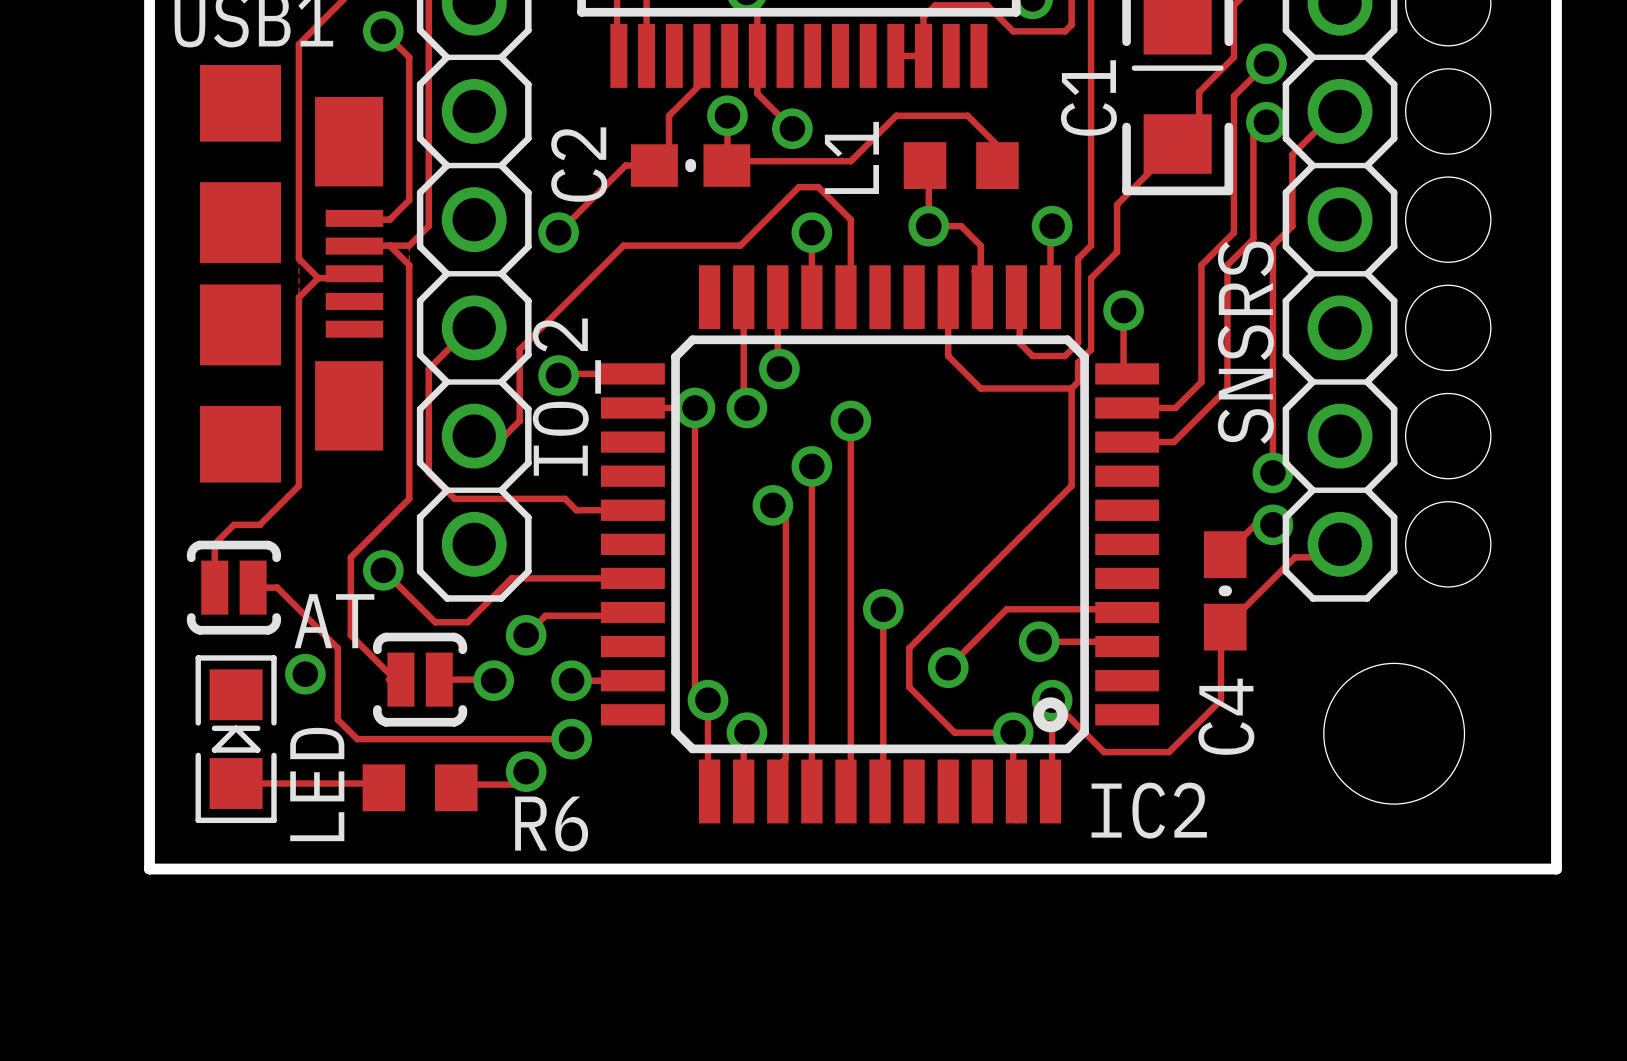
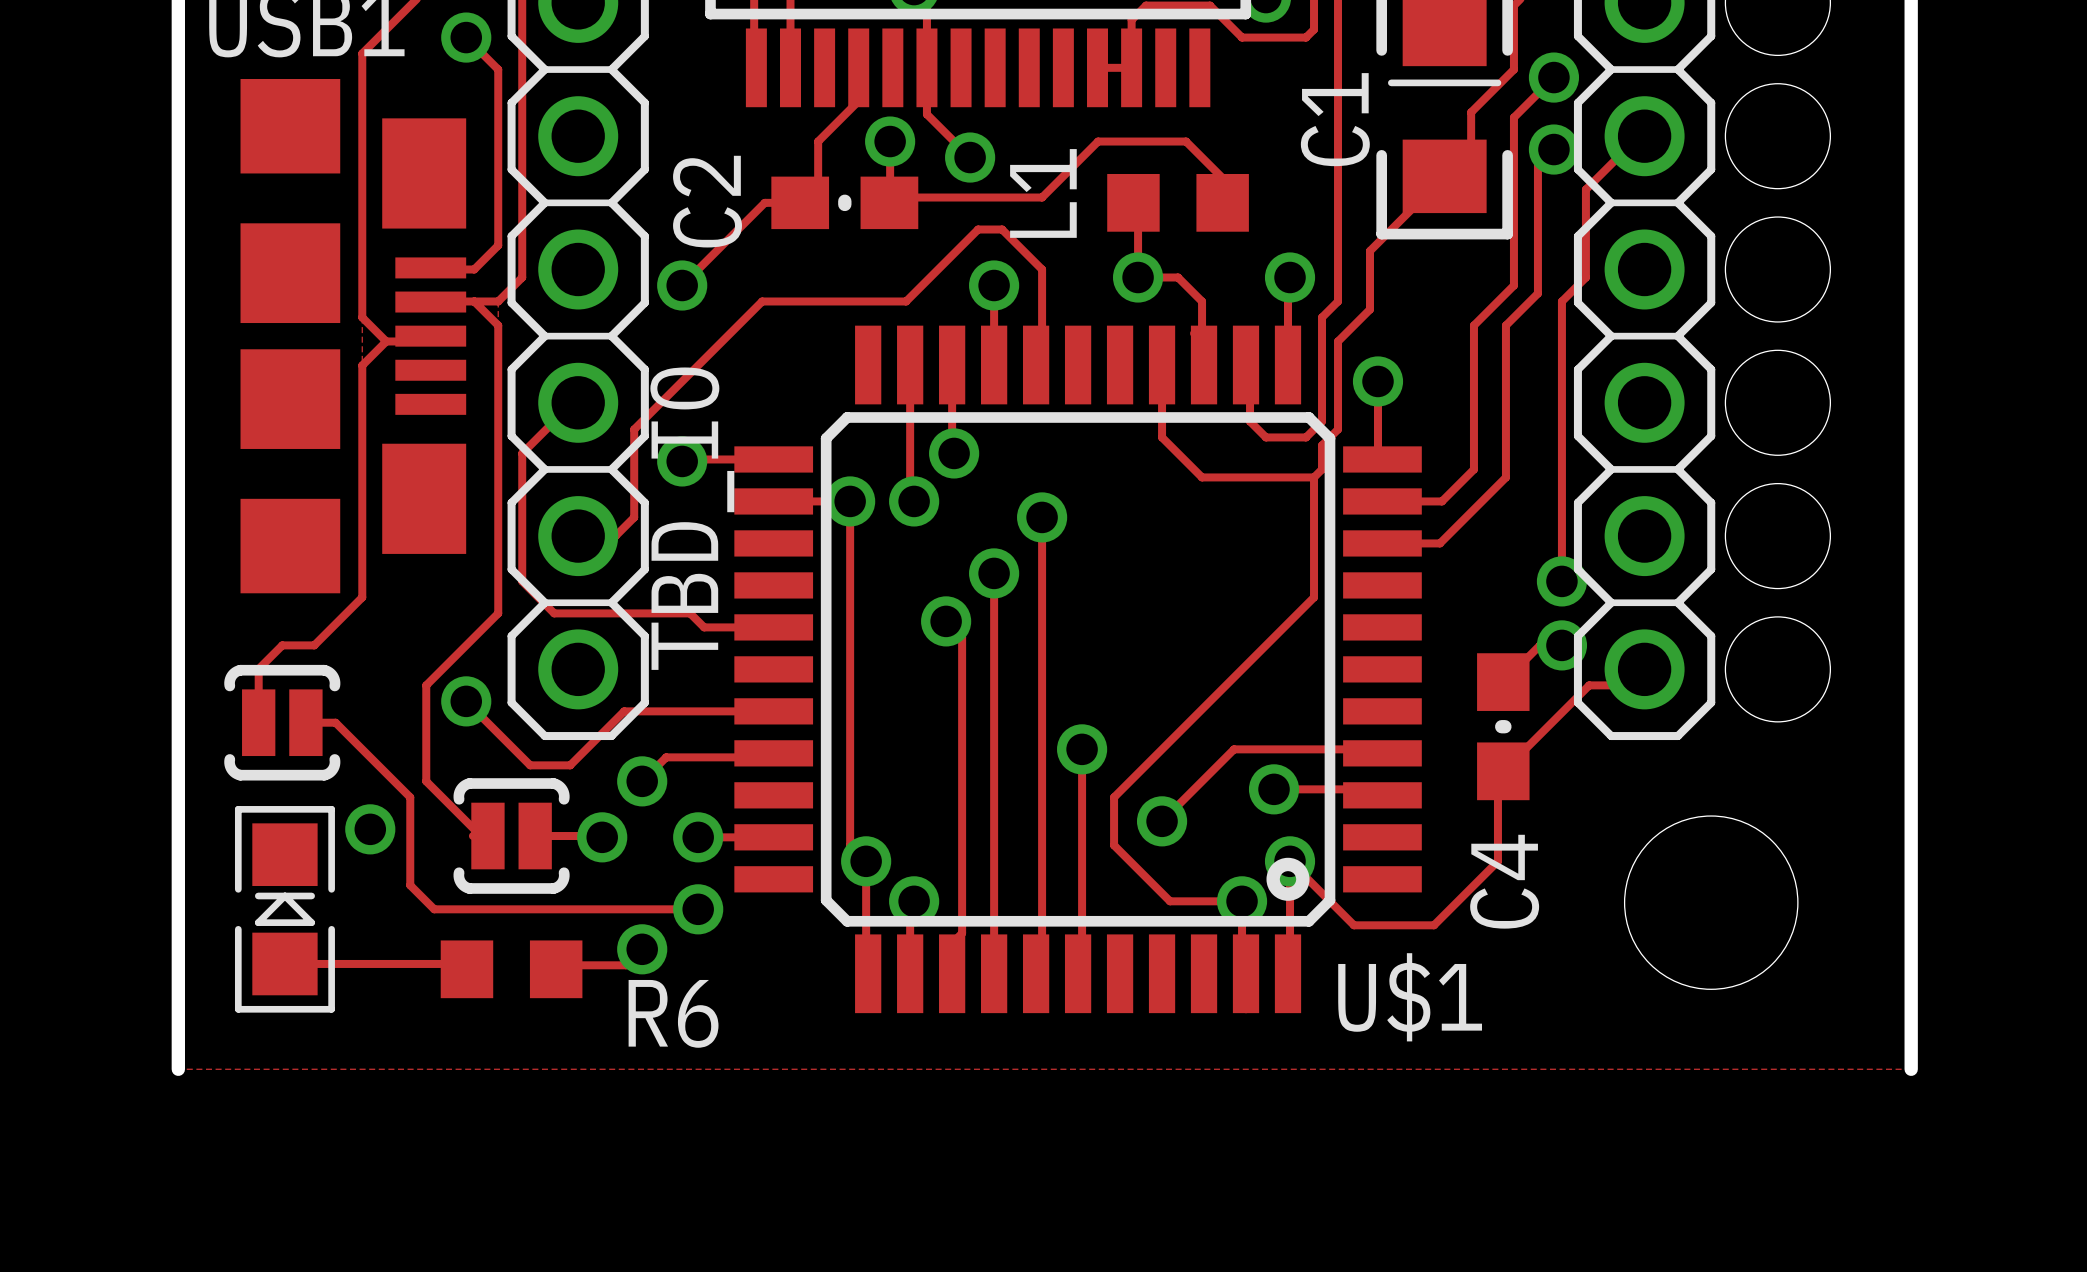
text: SNSRS (1245, 342) -> none
IO_2 name: IO_2 (566, 397) -> TBD_IO (692, 518)
text: AT (334, 621) -> none
text: LED (317, 784) -> none
IC2 name: IC2 (1149, 810) -> U$1 (1410, 997)
board edge: (149, 869) (1556, 869) -> none

